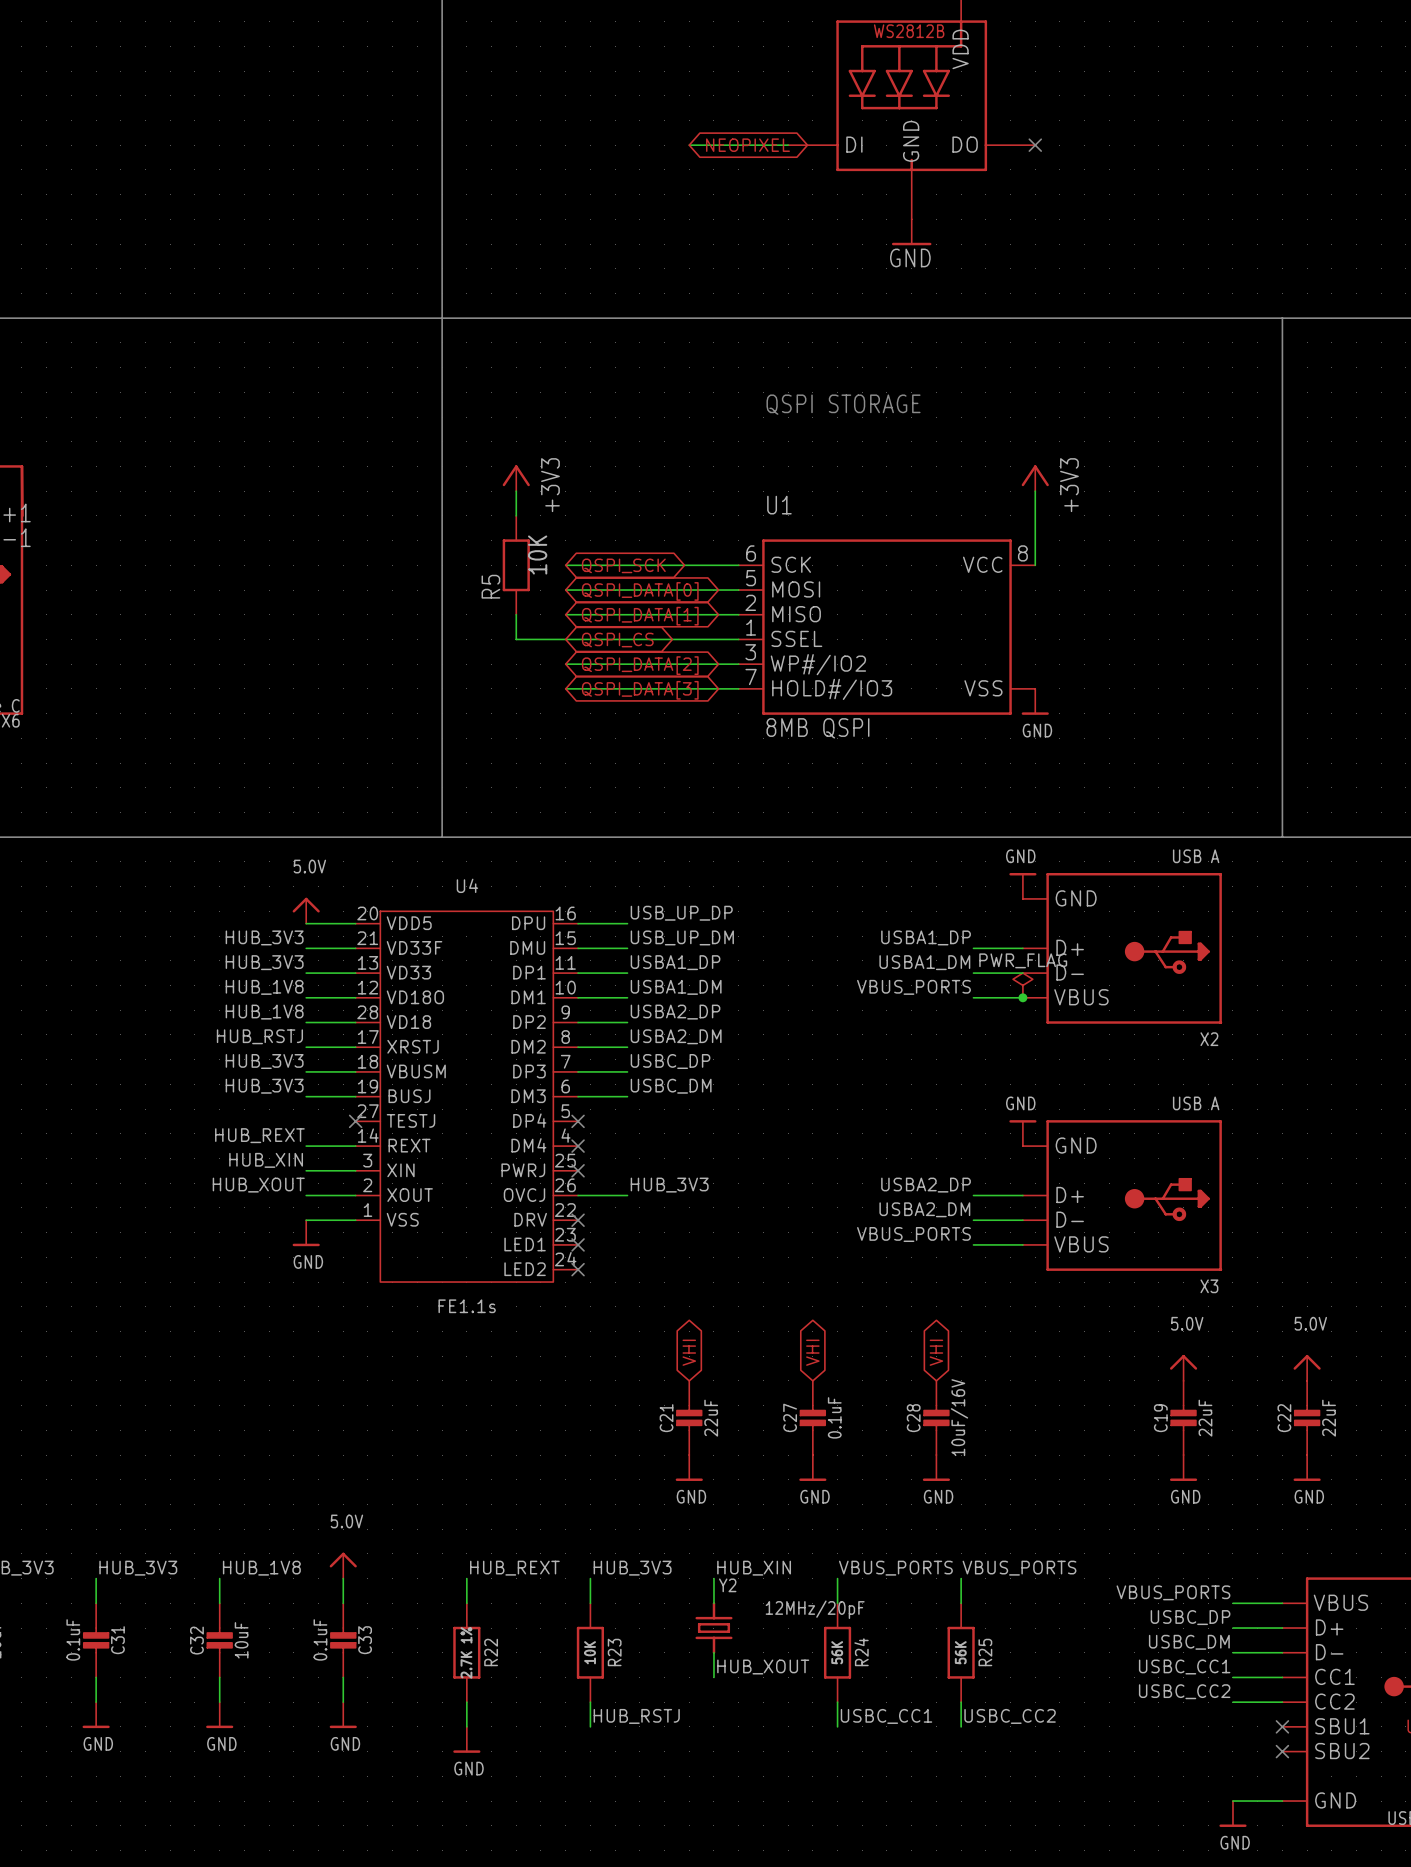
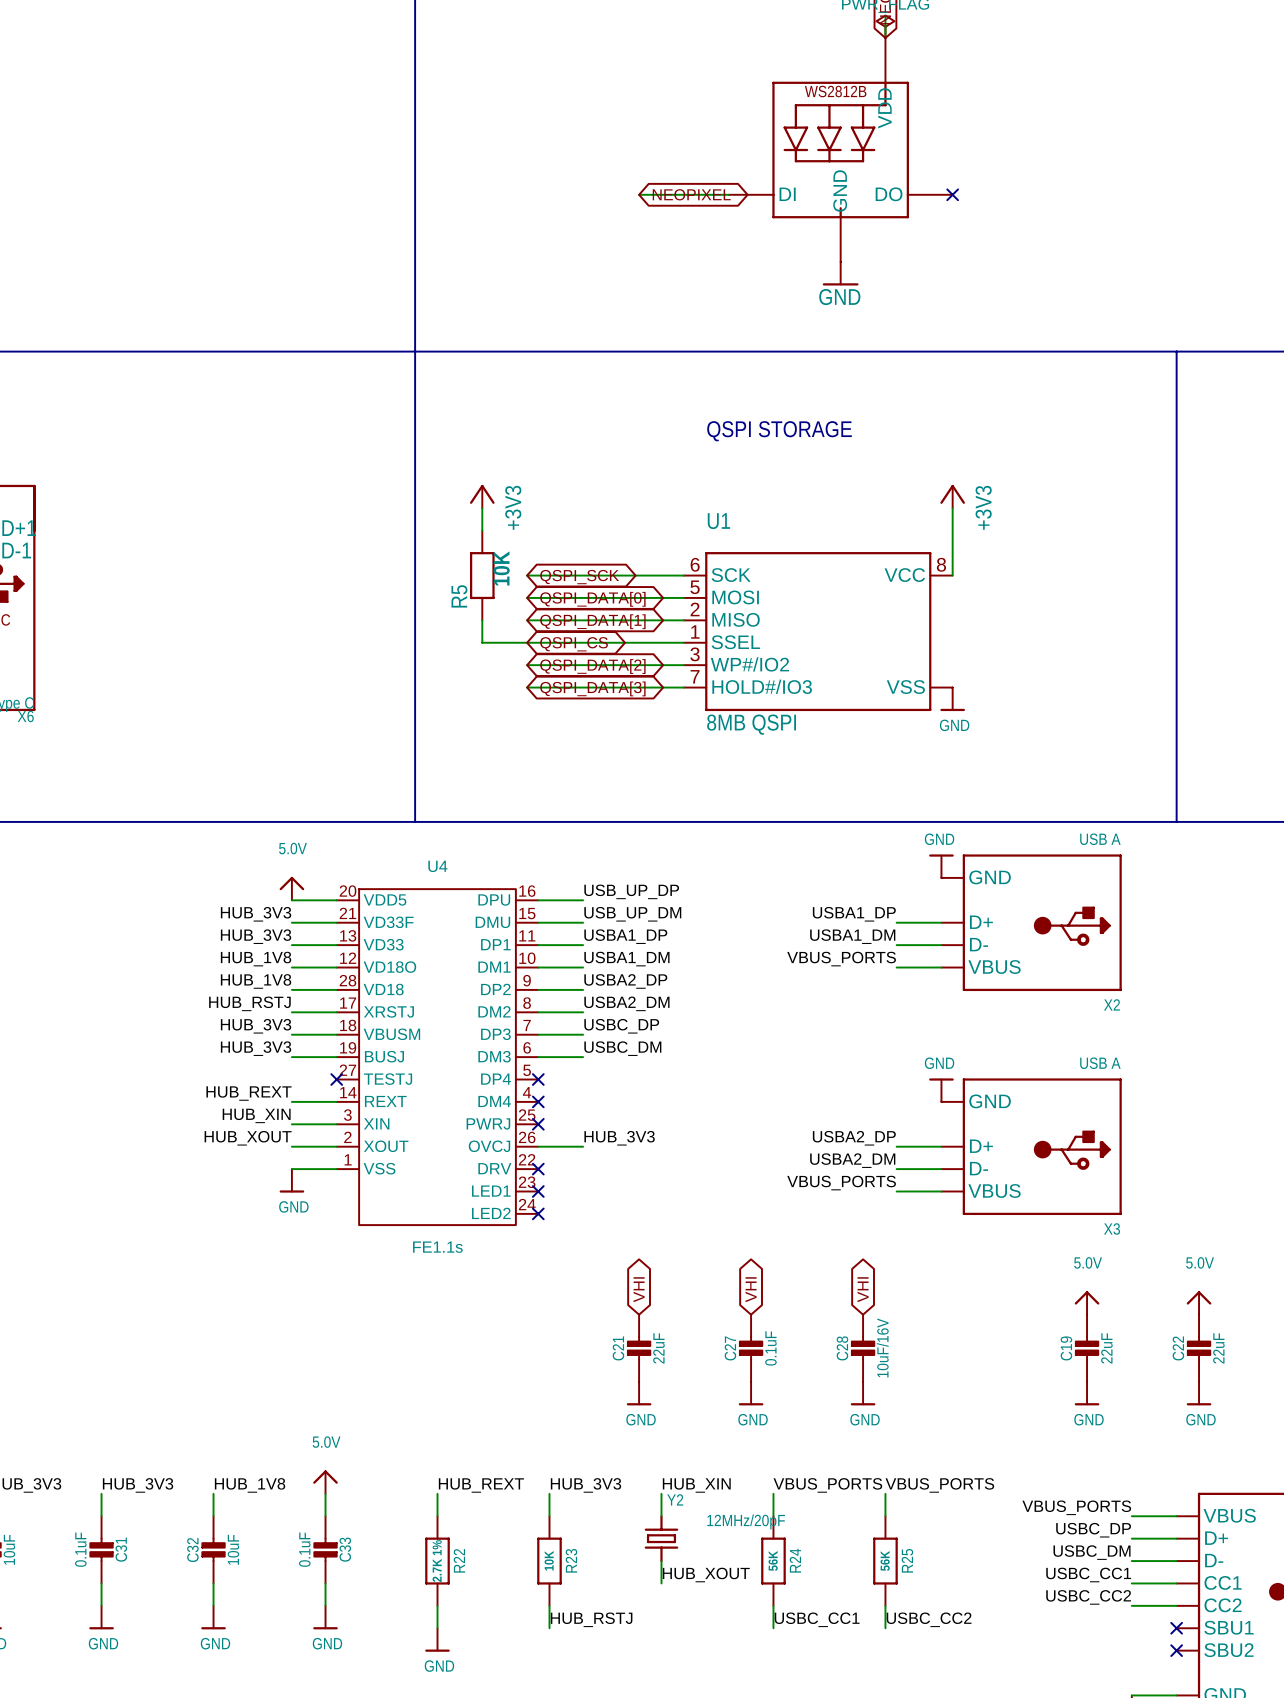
power symbol: PWR_FLAG (1022, 985) -> none
junction: (1022, 997) -> none

